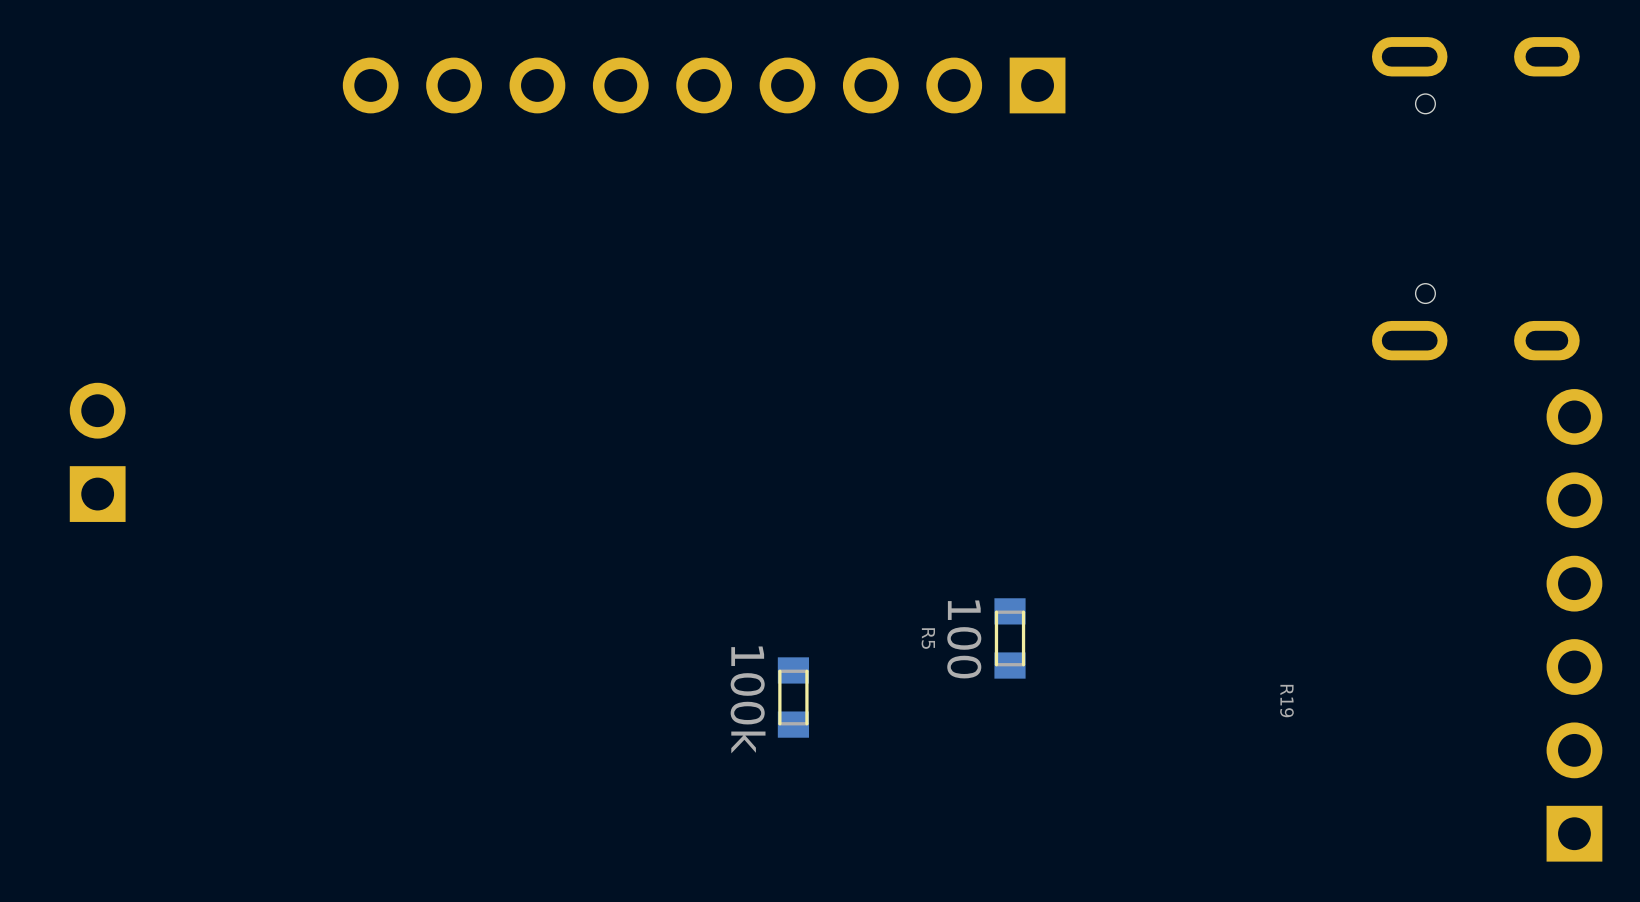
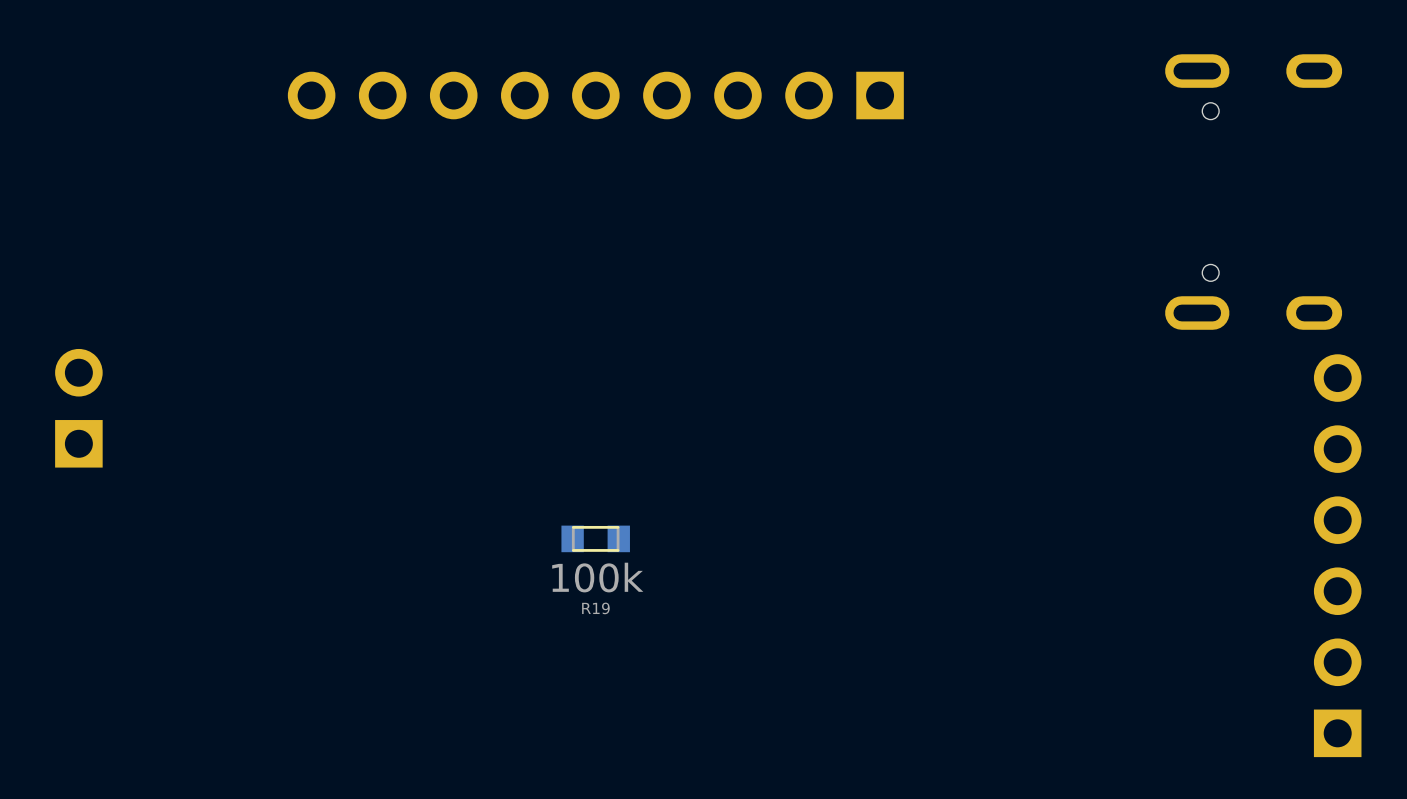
R5: 100 (1010, 638) -> none
R19 rotation: 0° (793, 697) -> 90° clockwise (595, 538)
R19 position: (793, 697) -> (595, 538)
R19 value position: 100k (748, 699) -> 100k (597, 577)
R19 name position: R19 (1286, 701) -> R19 (595, 608)

